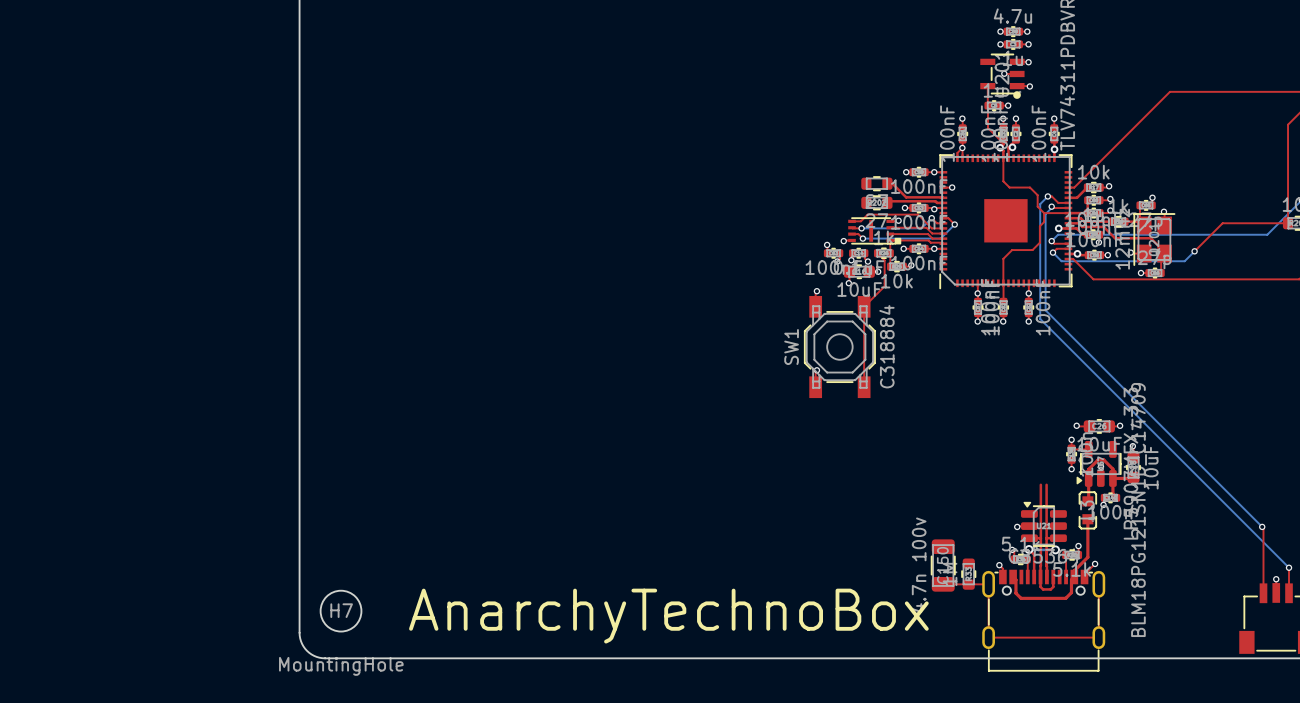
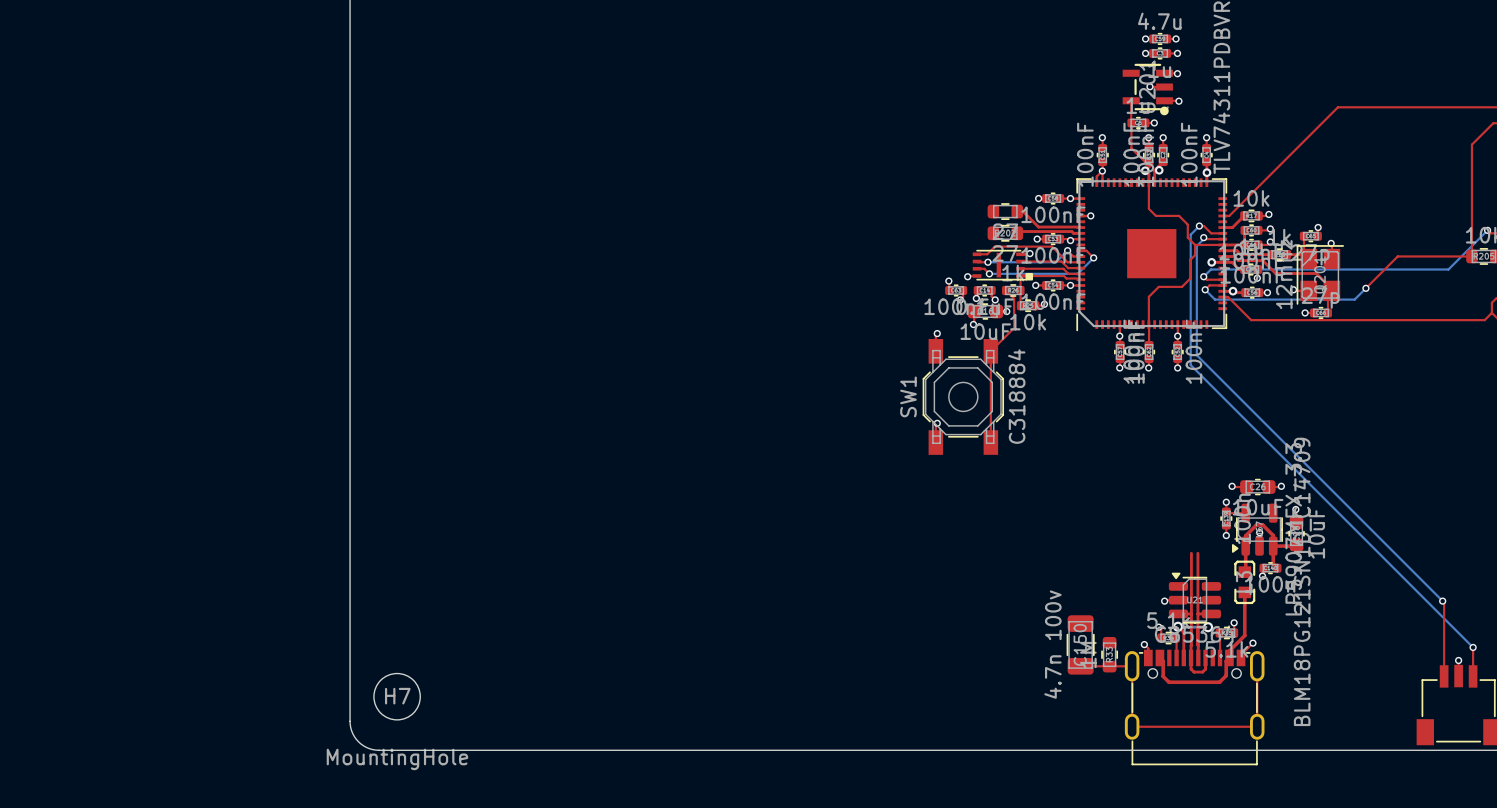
text: AnarchyTechnoBox (668, 616) -> none

